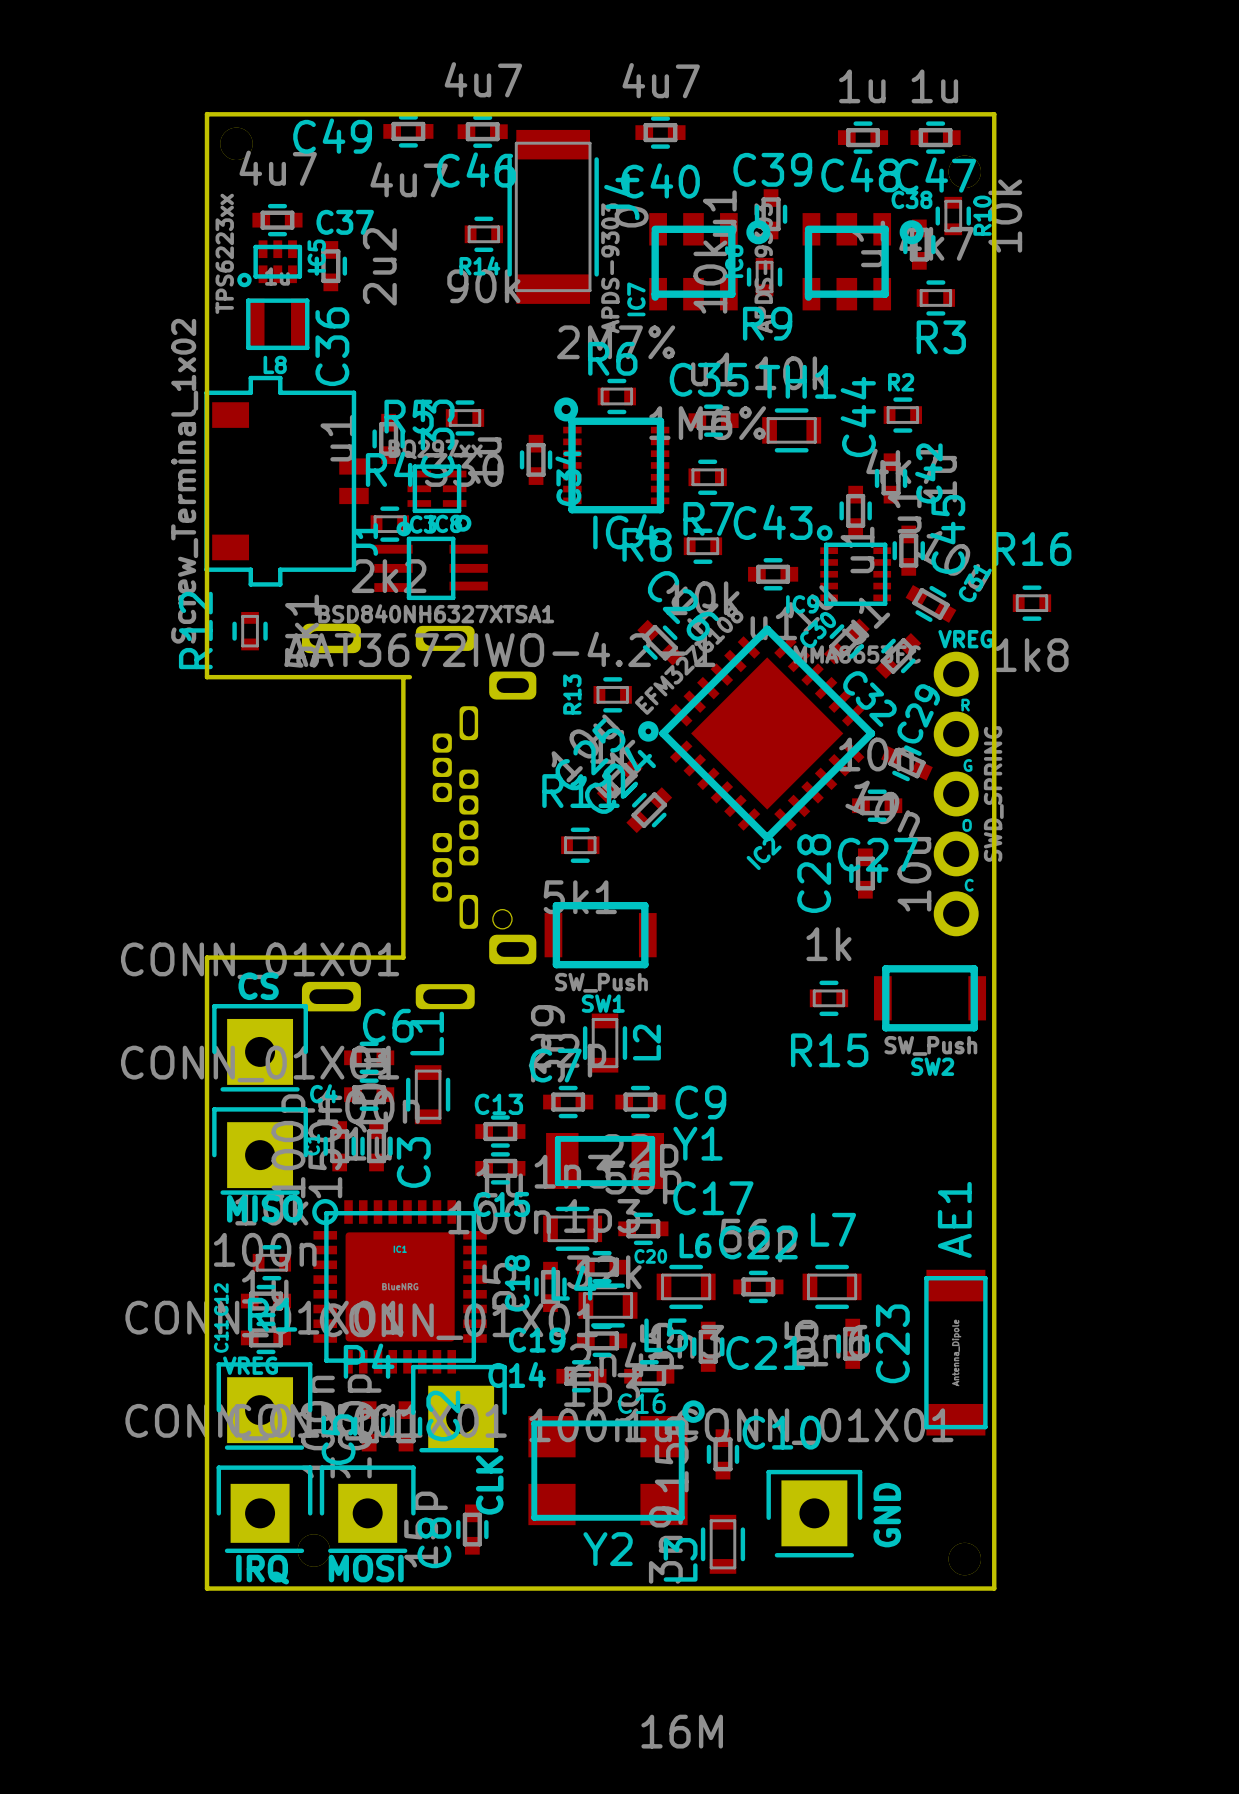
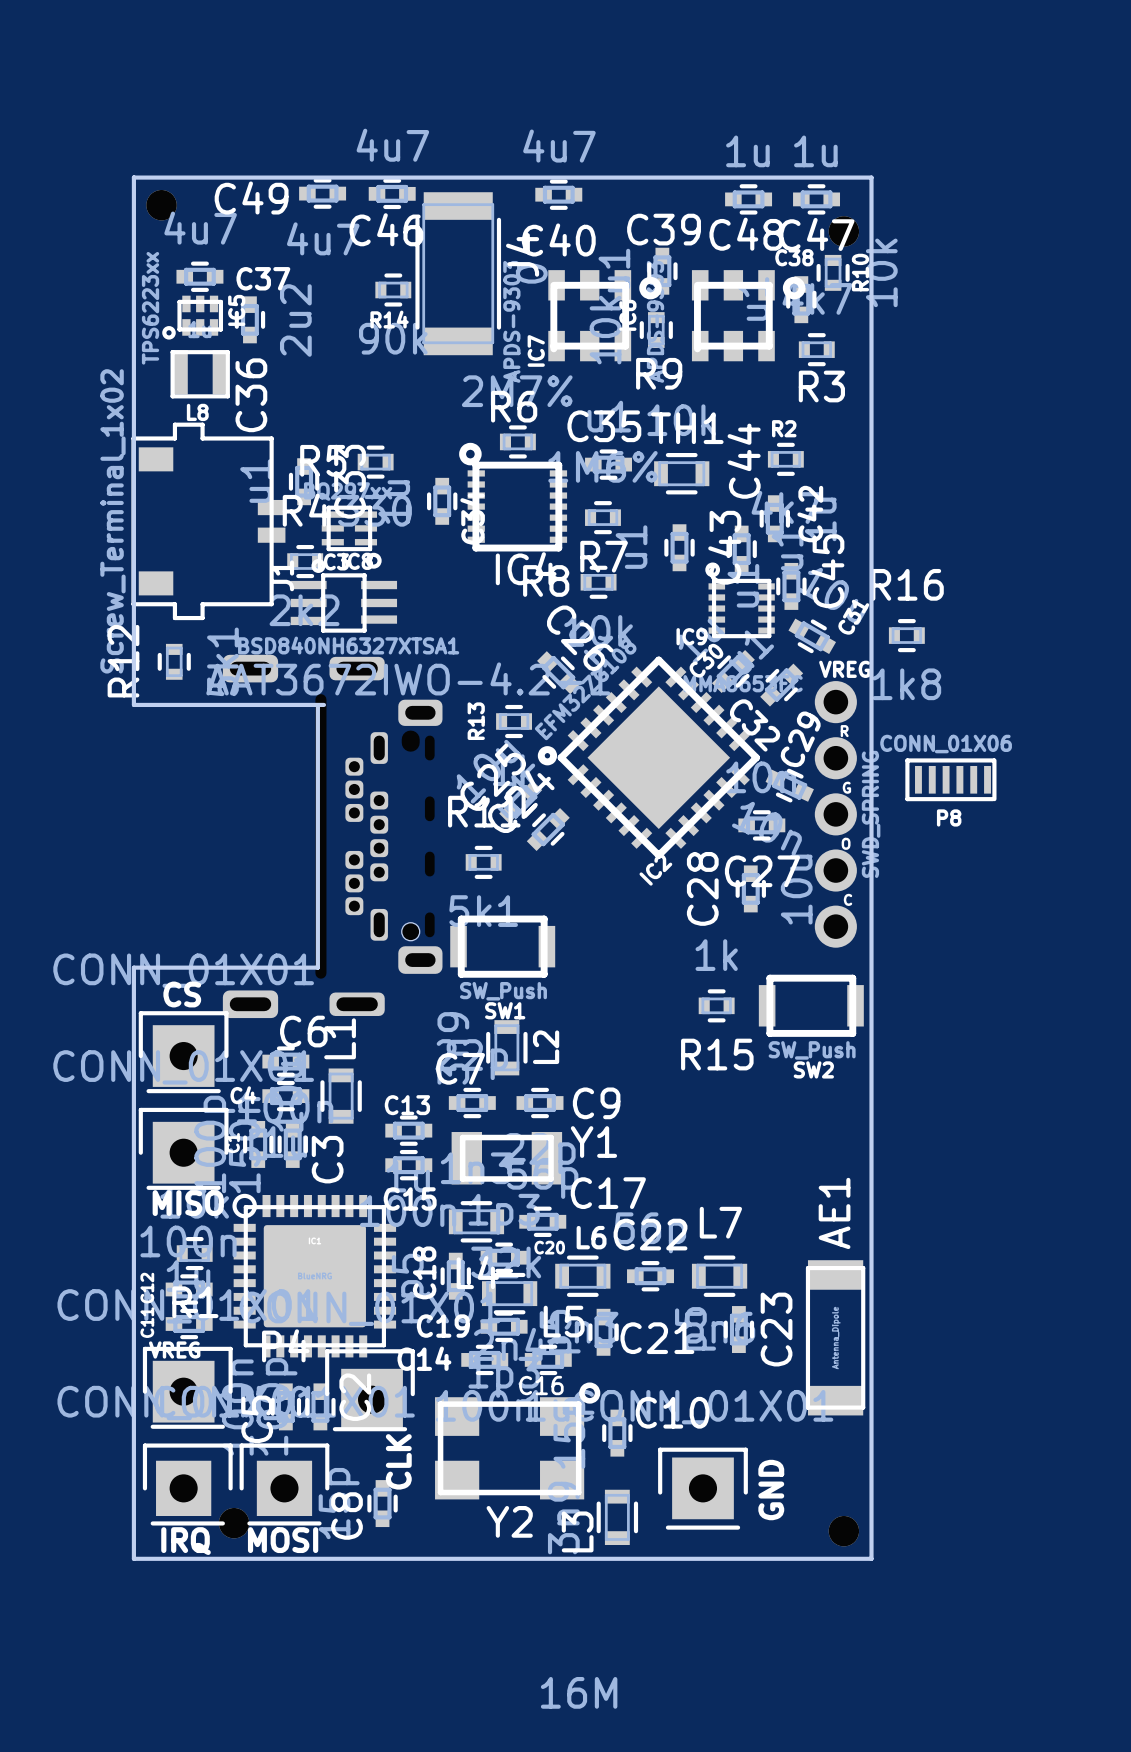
C43 rotation: 0° (773, 574) -> 90° clockwise (679, 547)
C43 position: (773, 574) -> (679, 547)
P8: none -> CONN_01X06 (950, 779)

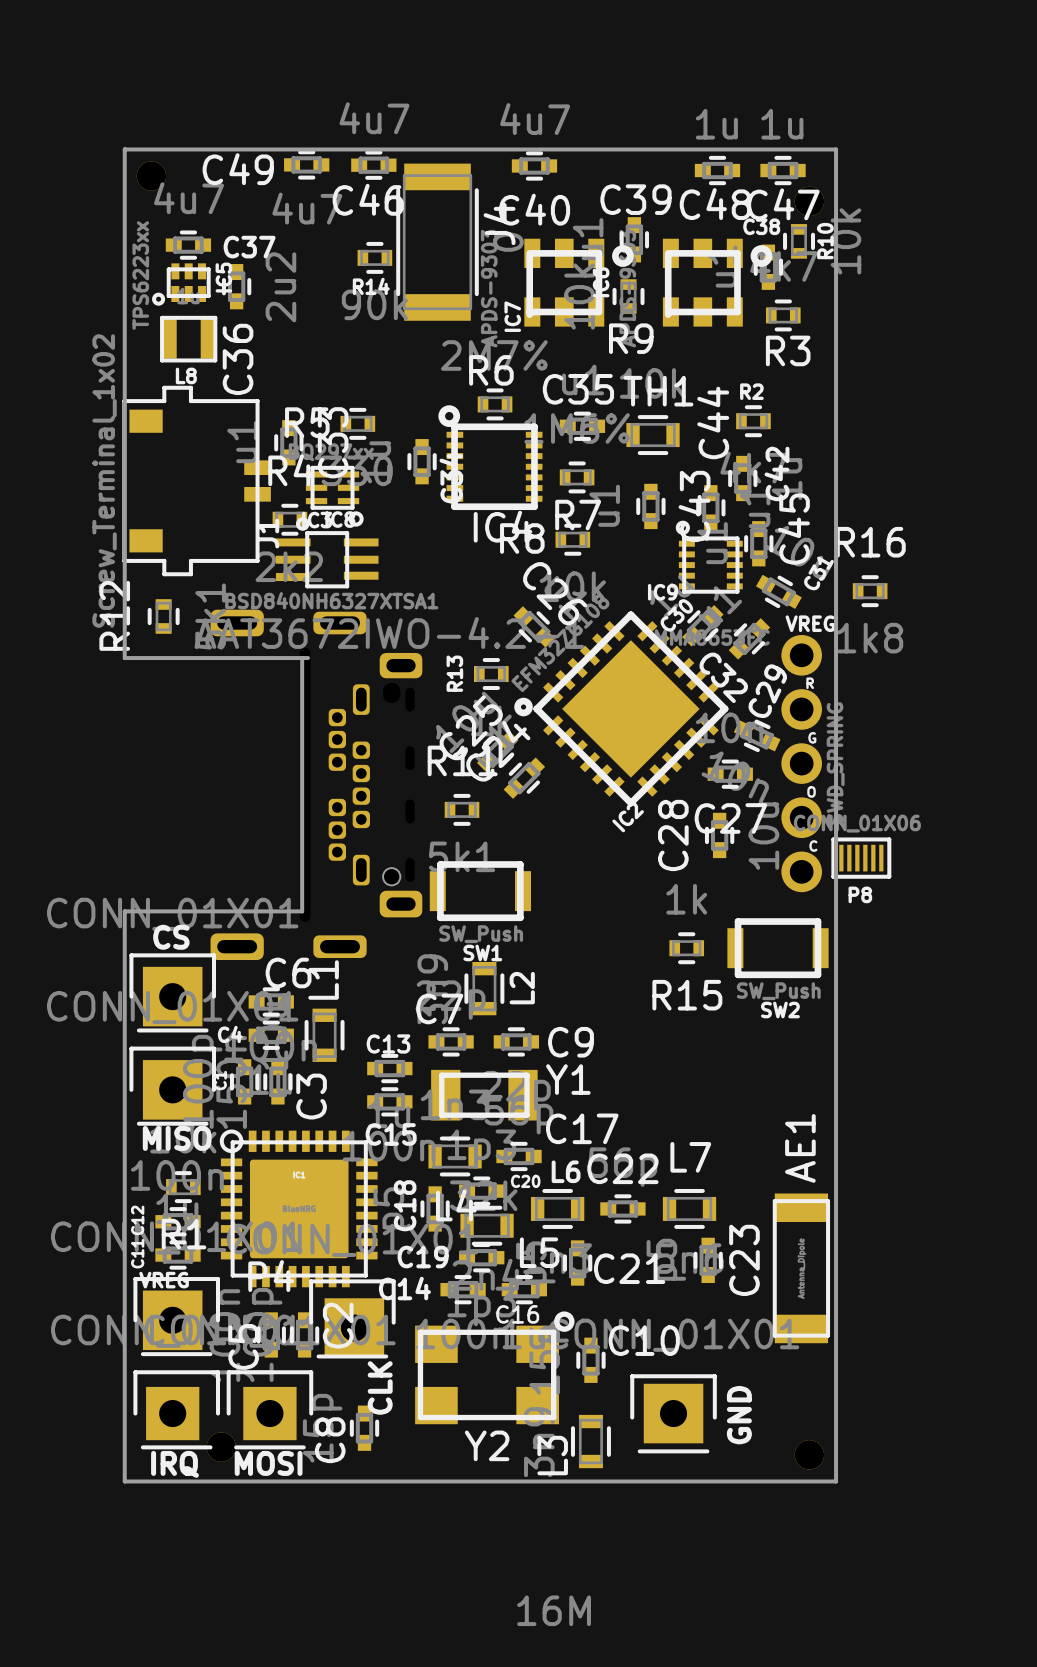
P8 footprint: [905, 758, 997, 802] -> [831, 837, 892, 879]

